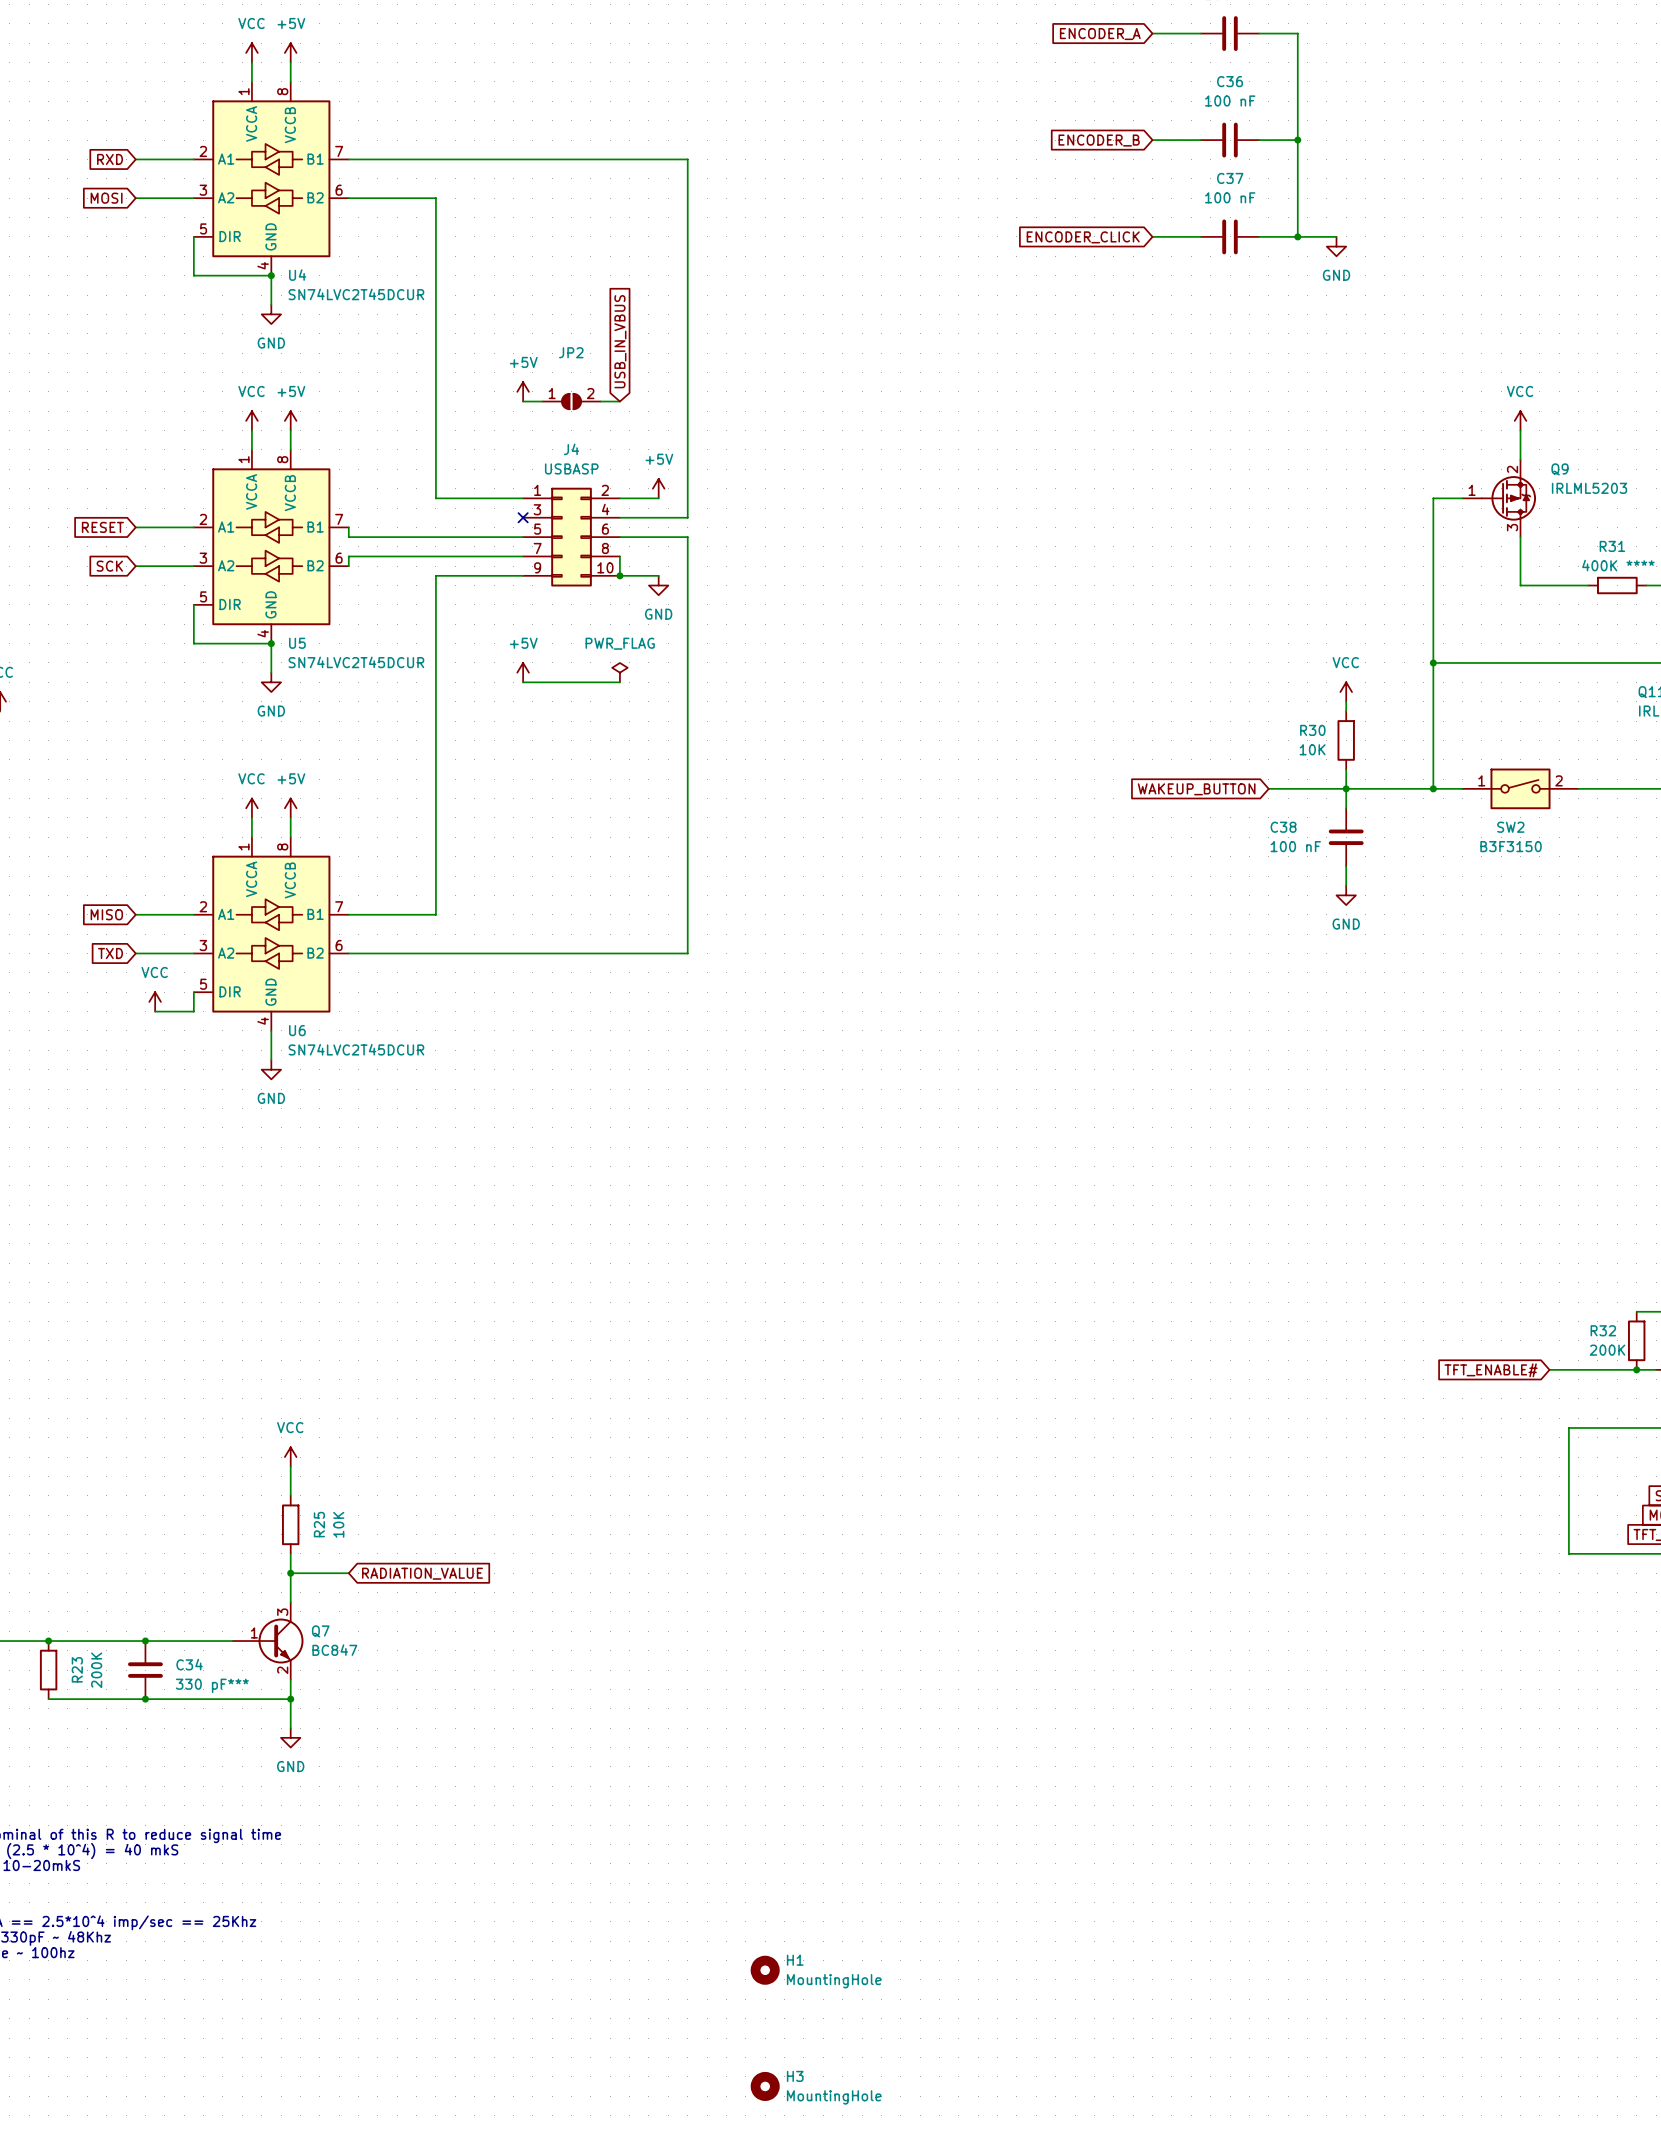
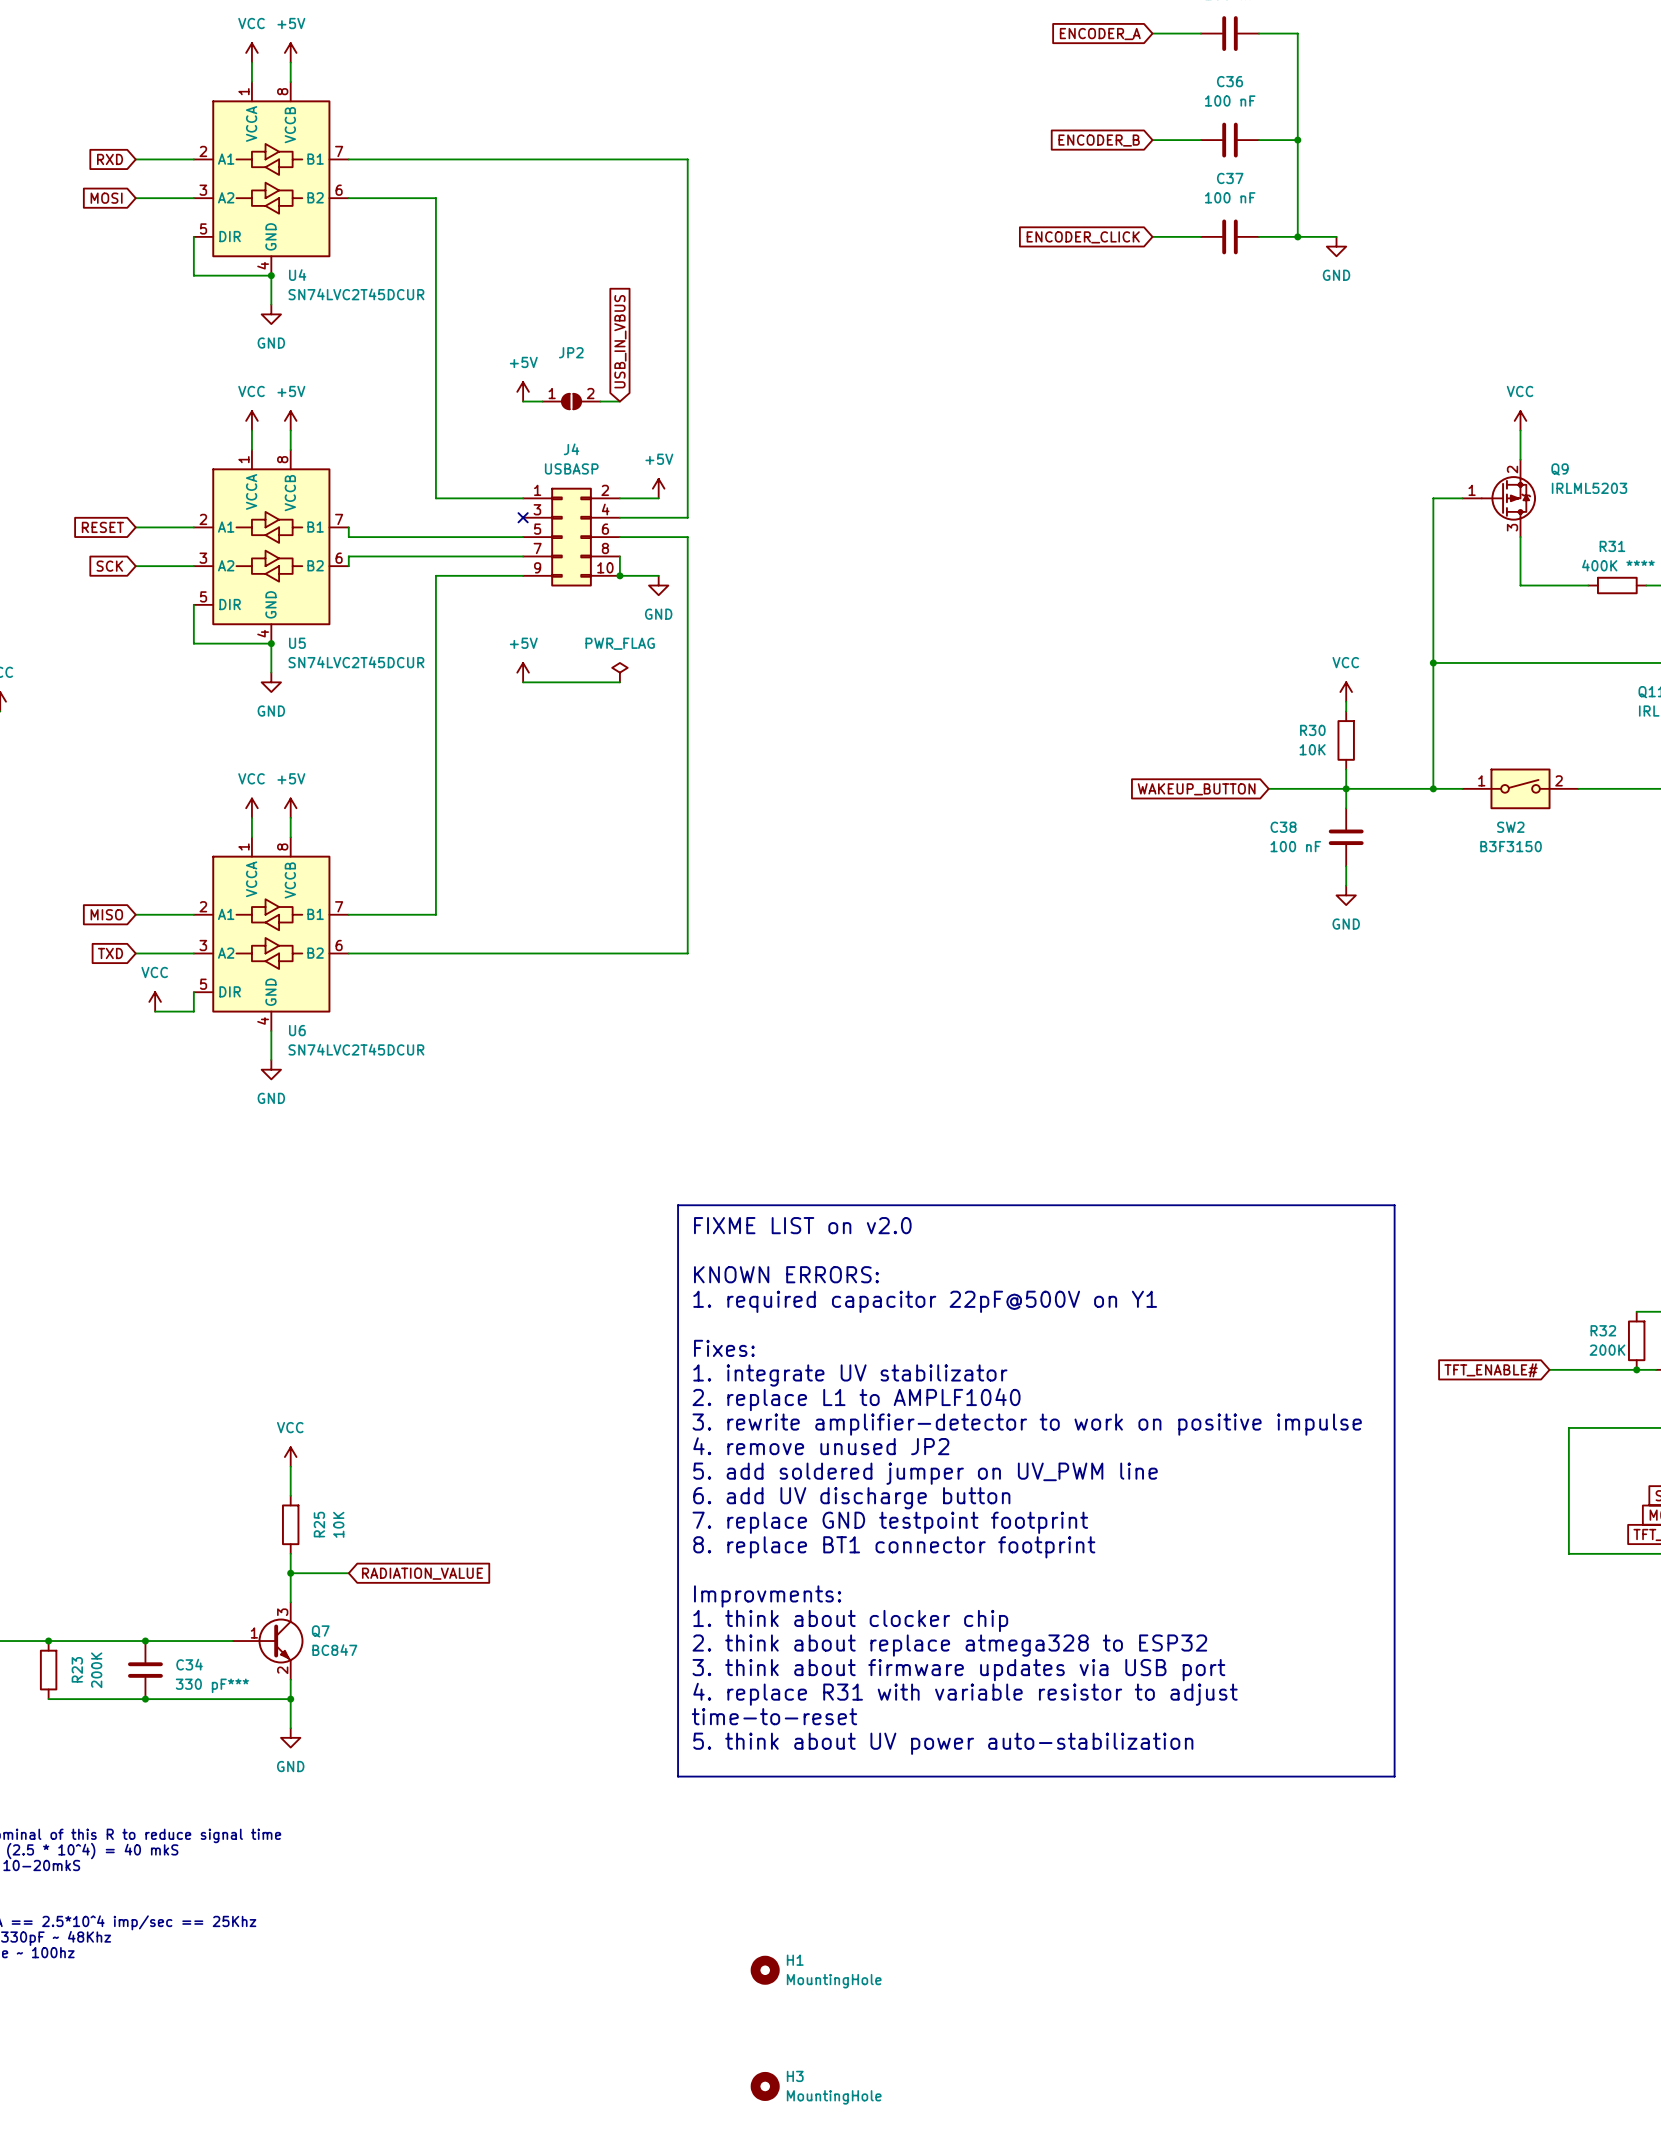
line: none -> (678, 1205) (1394, 1205) (1394, 1776) (678, 1776) (678, 1205)
text: none -> FIXME LIST on v2.0 (802, 1225)
text: none -> KNOWN ERRORS: (786, 1274)
text: none -> 1. required capacitor 22pF@500V on Y1 (925, 1301)
text: none -> Fixes: (724, 1348)
text: none -> 1. integrate UV stabilizator (850, 1375)
text: none -> 2. replace L1 to AMPLF1040 (856, 1399)
text: none -> 3. rewrite amplifier-detector to work on positive impulse (1027, 1424)
text: none -> 4. remove unused JP2 (821, 1446)
text: none -> 5. add soldered jumper on UV_PWM line (925, 1473)
text: none -> 6. add UV discharge button (851, 1498)
text: none -> 7. replace GND testpoint footprint (890, 1522)
text: none -> 8. replace BT1 connector footprint (894, 1547)
text: none -> Improvments: (767, 1596)
text: none -> 1. think about clocker chip (850, 1620)
text: none -> 2. think about replace atmega328 to ESP32 (949, 1645)
text: none -> 3. think about firmware updates via USB port (958, 1670)
text: none -> 4. replace R31 with variable resistor to adjust (965, 1694)
text: none -> time-to-reset (774, 1716)
text: none -> 5. think about UV power auto-stabilization (943, 1743)

